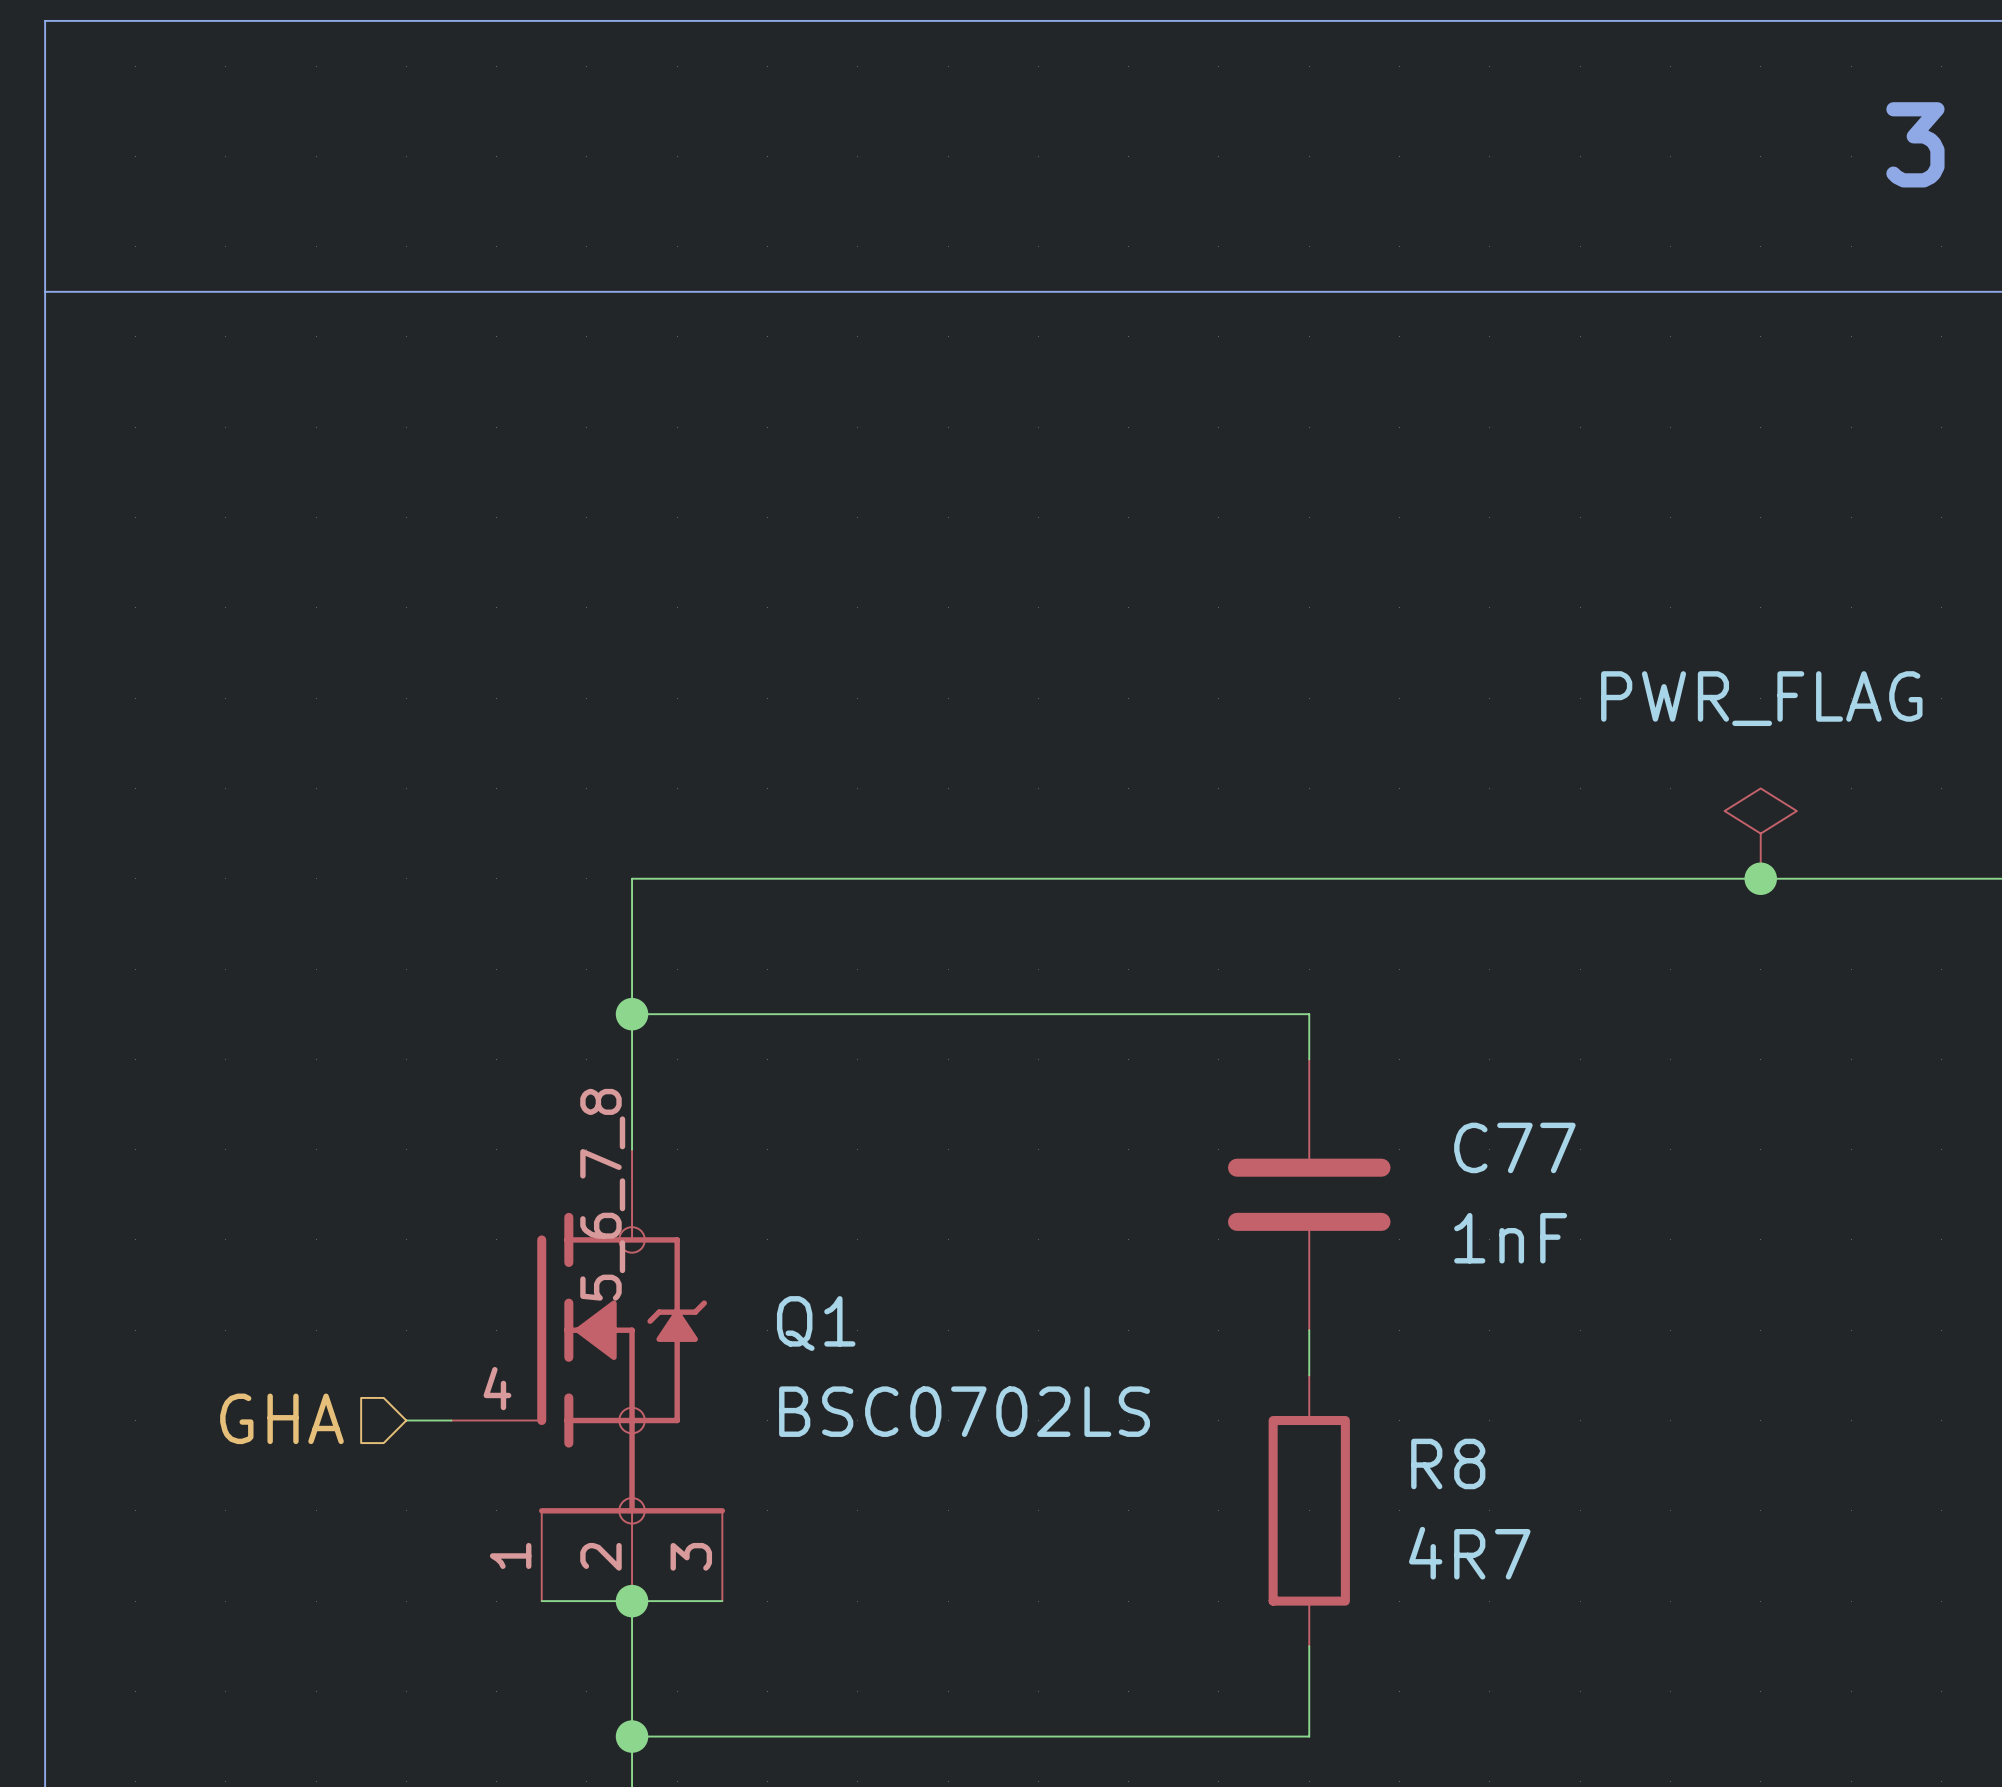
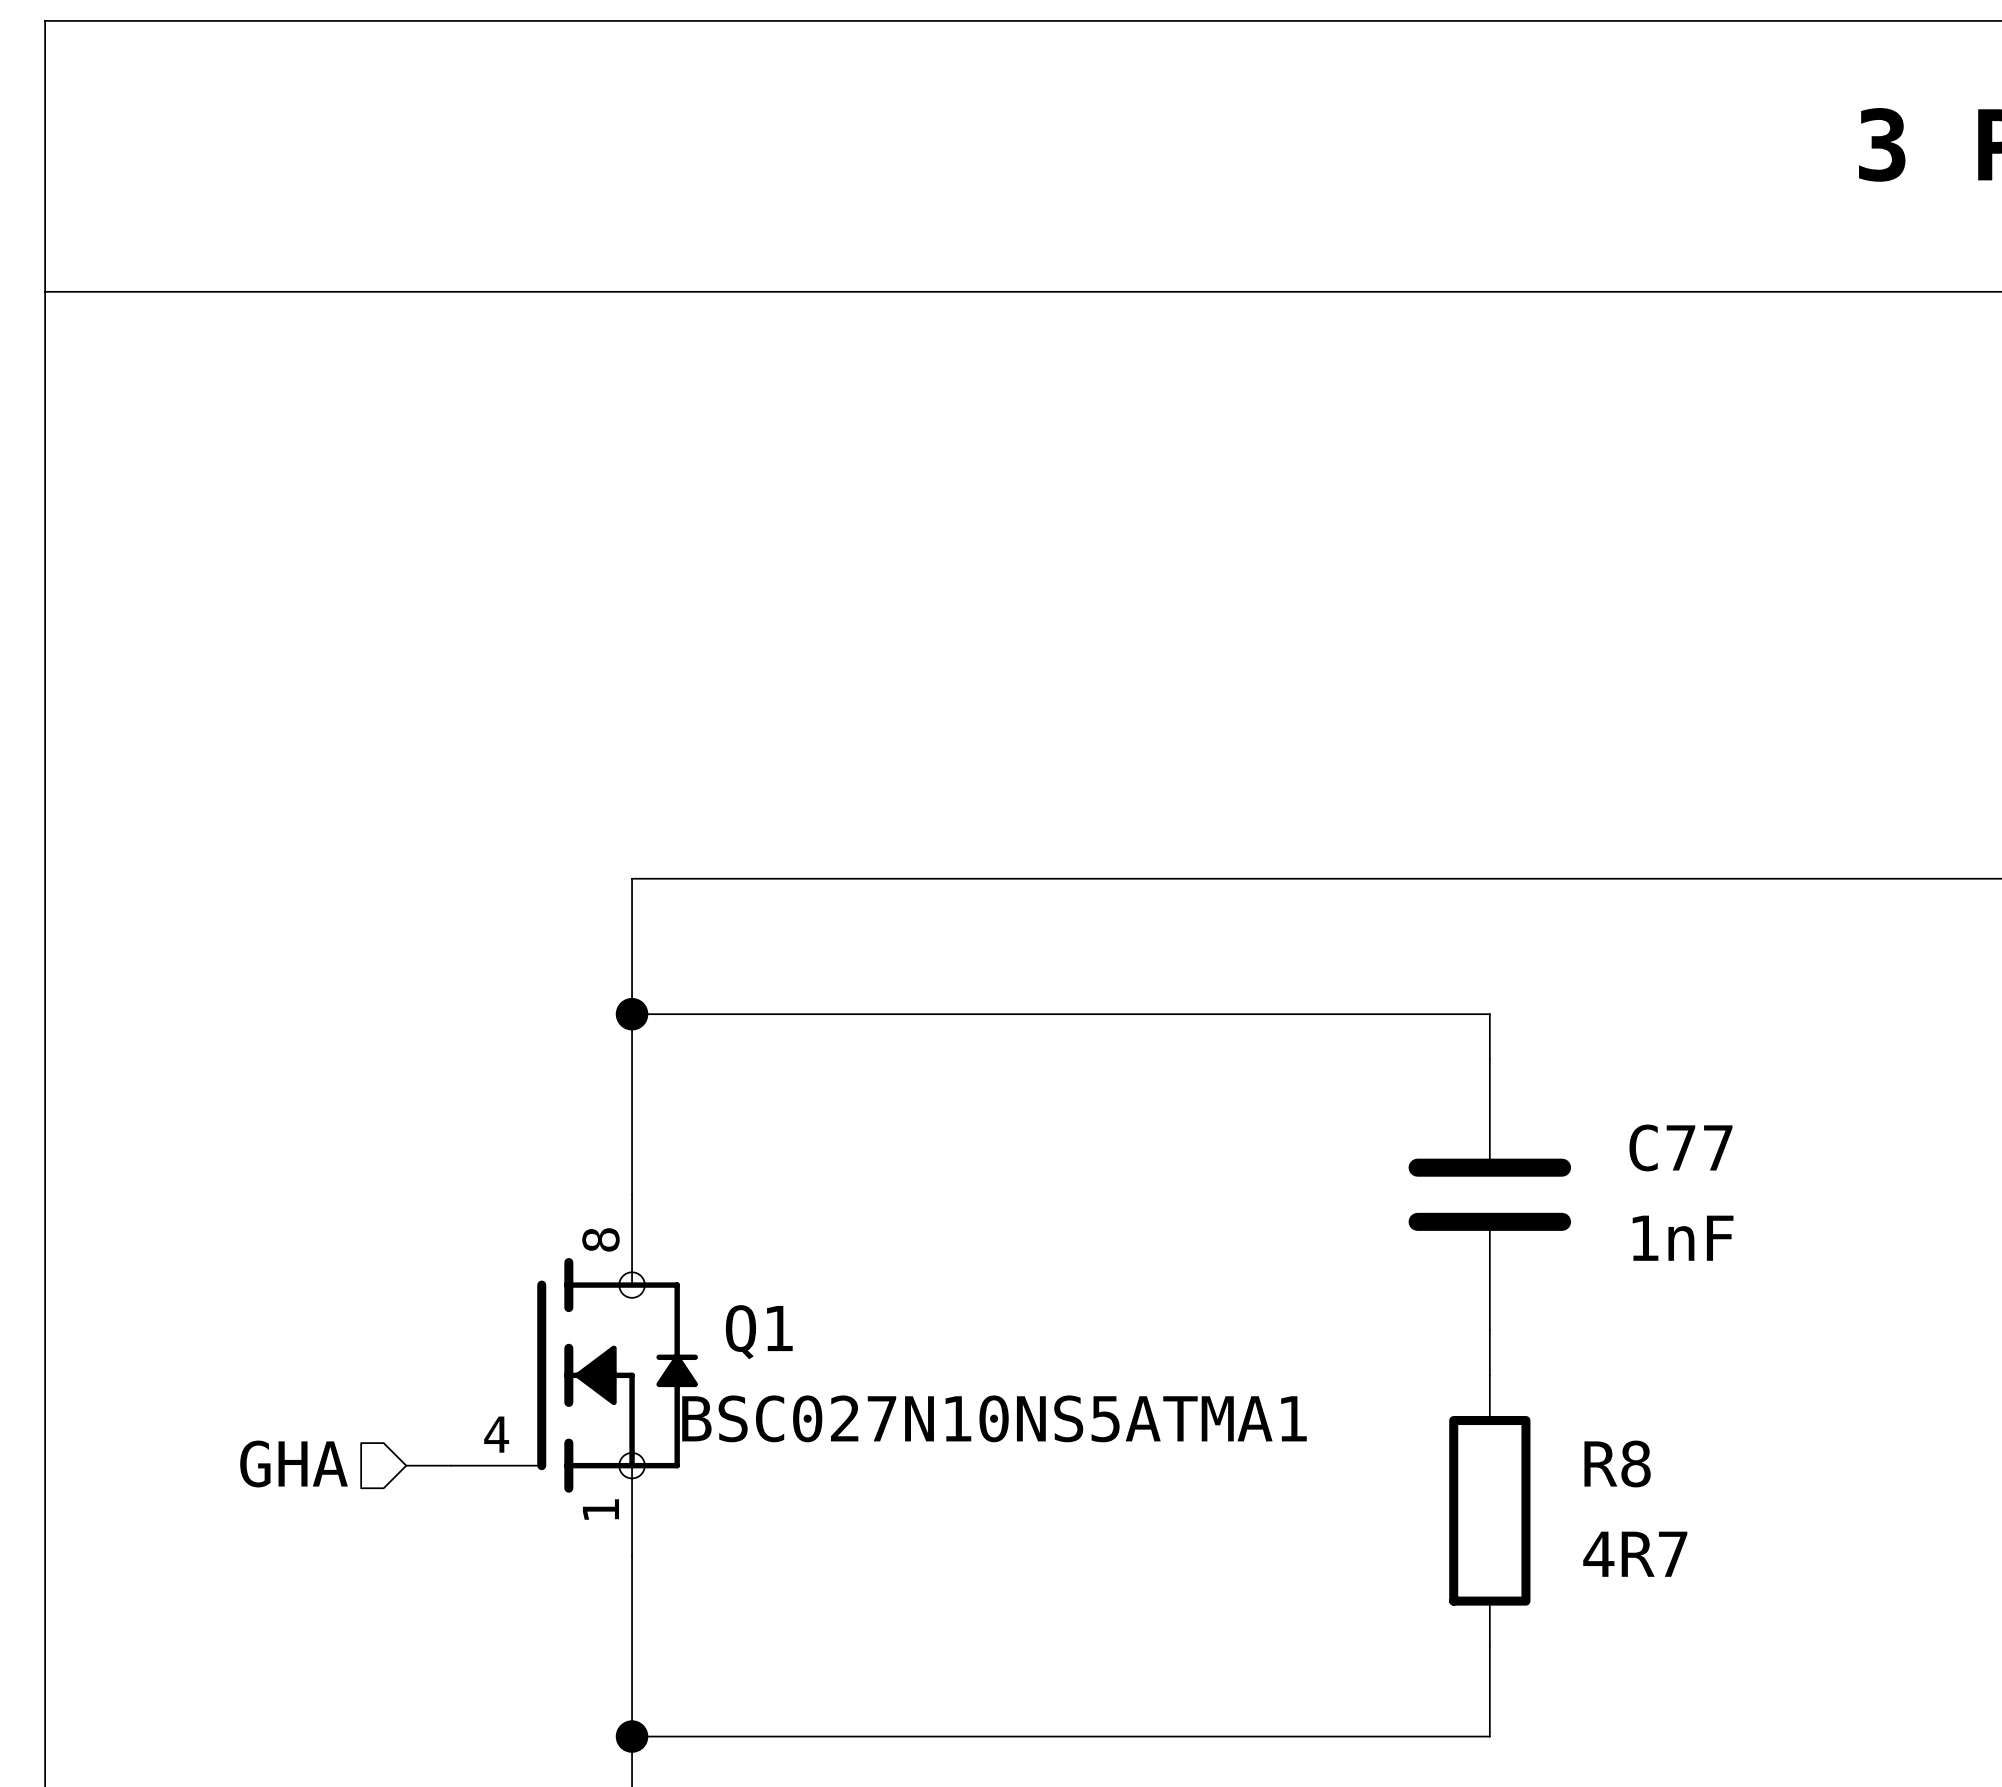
power symbol: PWR_FLAG (1760, 833) -> none
junction: (1760, 878) -> none
wire: (1309, 1014) (1309, 1059) -> (1309, 1014) (1489, 1014) (1489, 1059)
Q1 symbol: [451, 1149, 726, 1602] -> [451, 1194, 698, 1556]
C77 position: (1309, 1194) -> (1489, 1194)
wire: (1309, 1330) (1309, 1375) -> (1489, 1330) (1489, 1375)
Q1 value: BSC0702LS (964, 1411) -> BSC027N10NS5ATMA1 (994, 1418)
hierarchical label position: GHA (281, 1418) -> GHA (294, 1464)
wire: (406, 1420) (451, 1420) -> (406, 1465) (451, 1465)
R8 position: (1309, 1510) -> (1489, 1510)
wire: (541, 1601) (722, 1601) -> none
junction: (632, 1601) -> none
wire: (1309, 1646) (1309, 1736) -> (1489, 1646) (1489, 1736) (1309, 1736)

